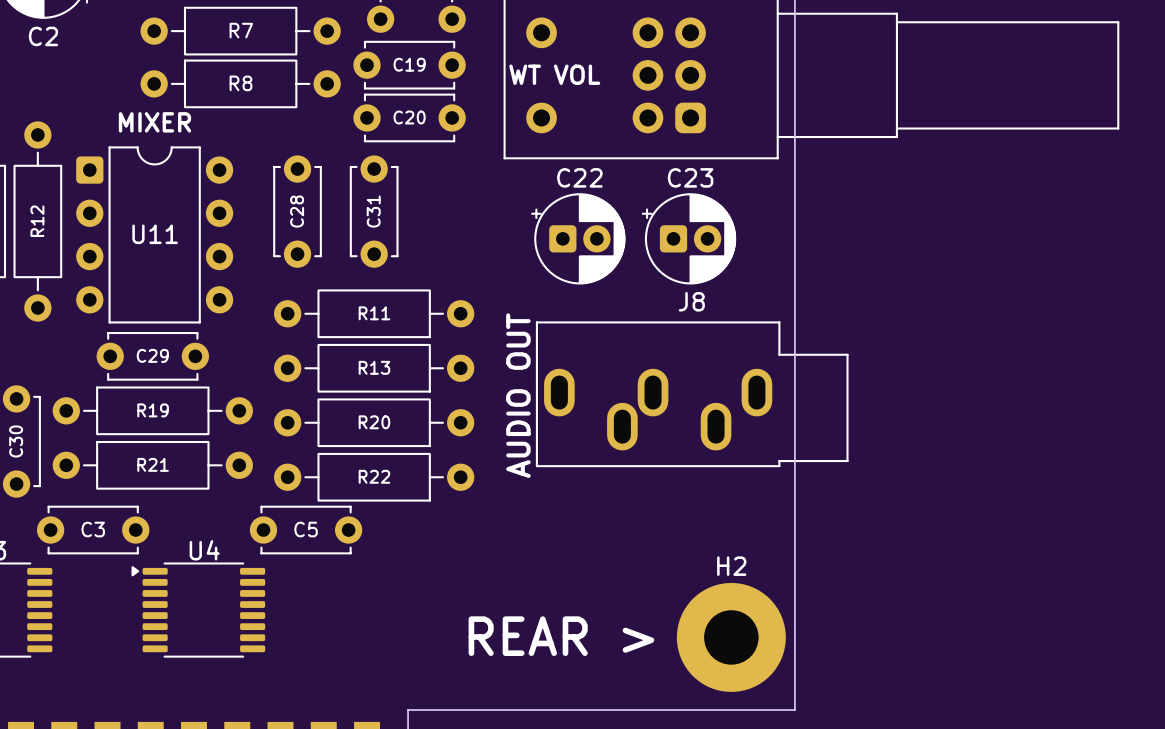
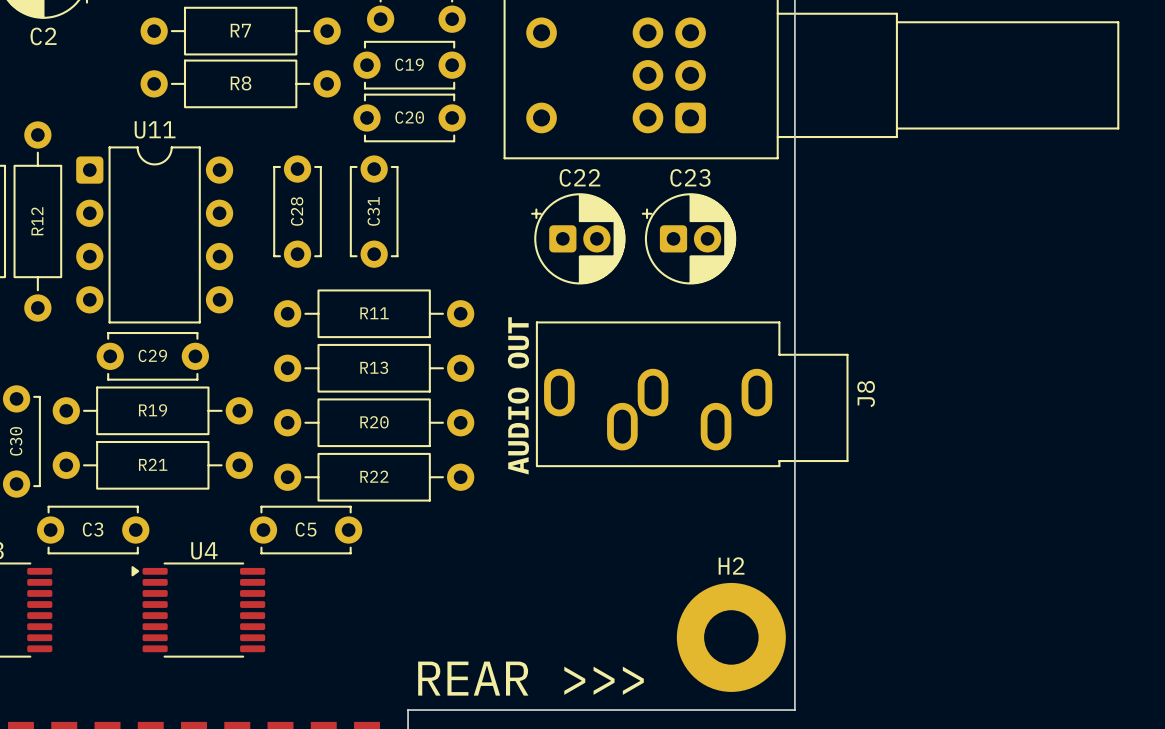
text: WT VOL (554, 74) -> none
text: MIXER (154, 122) -> none
U11 name position: U11 (155, 234) -> U11 (155, 129)
J8 name rotation: 0° (691, 301) -> 90° counterclockwise (866, 394)
J8 name position: J8 (691, 301) -> J8 (866, 394)
text: REAR > (561, 636) -> REAR >>> (530, 678)

